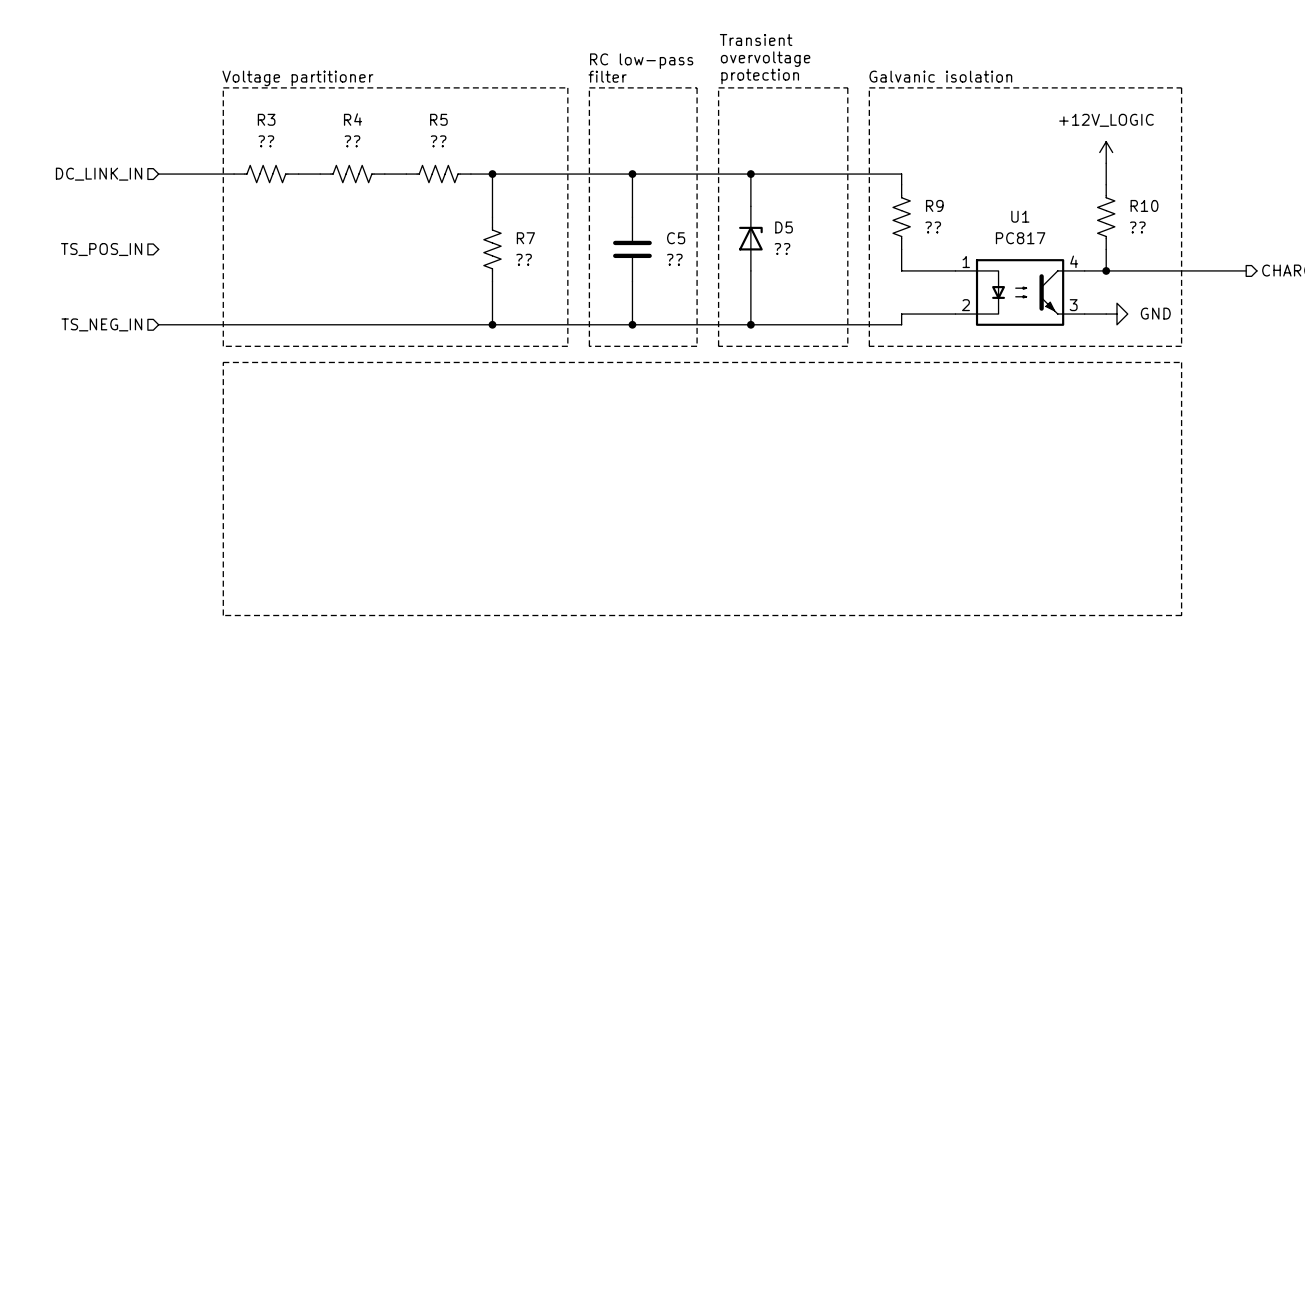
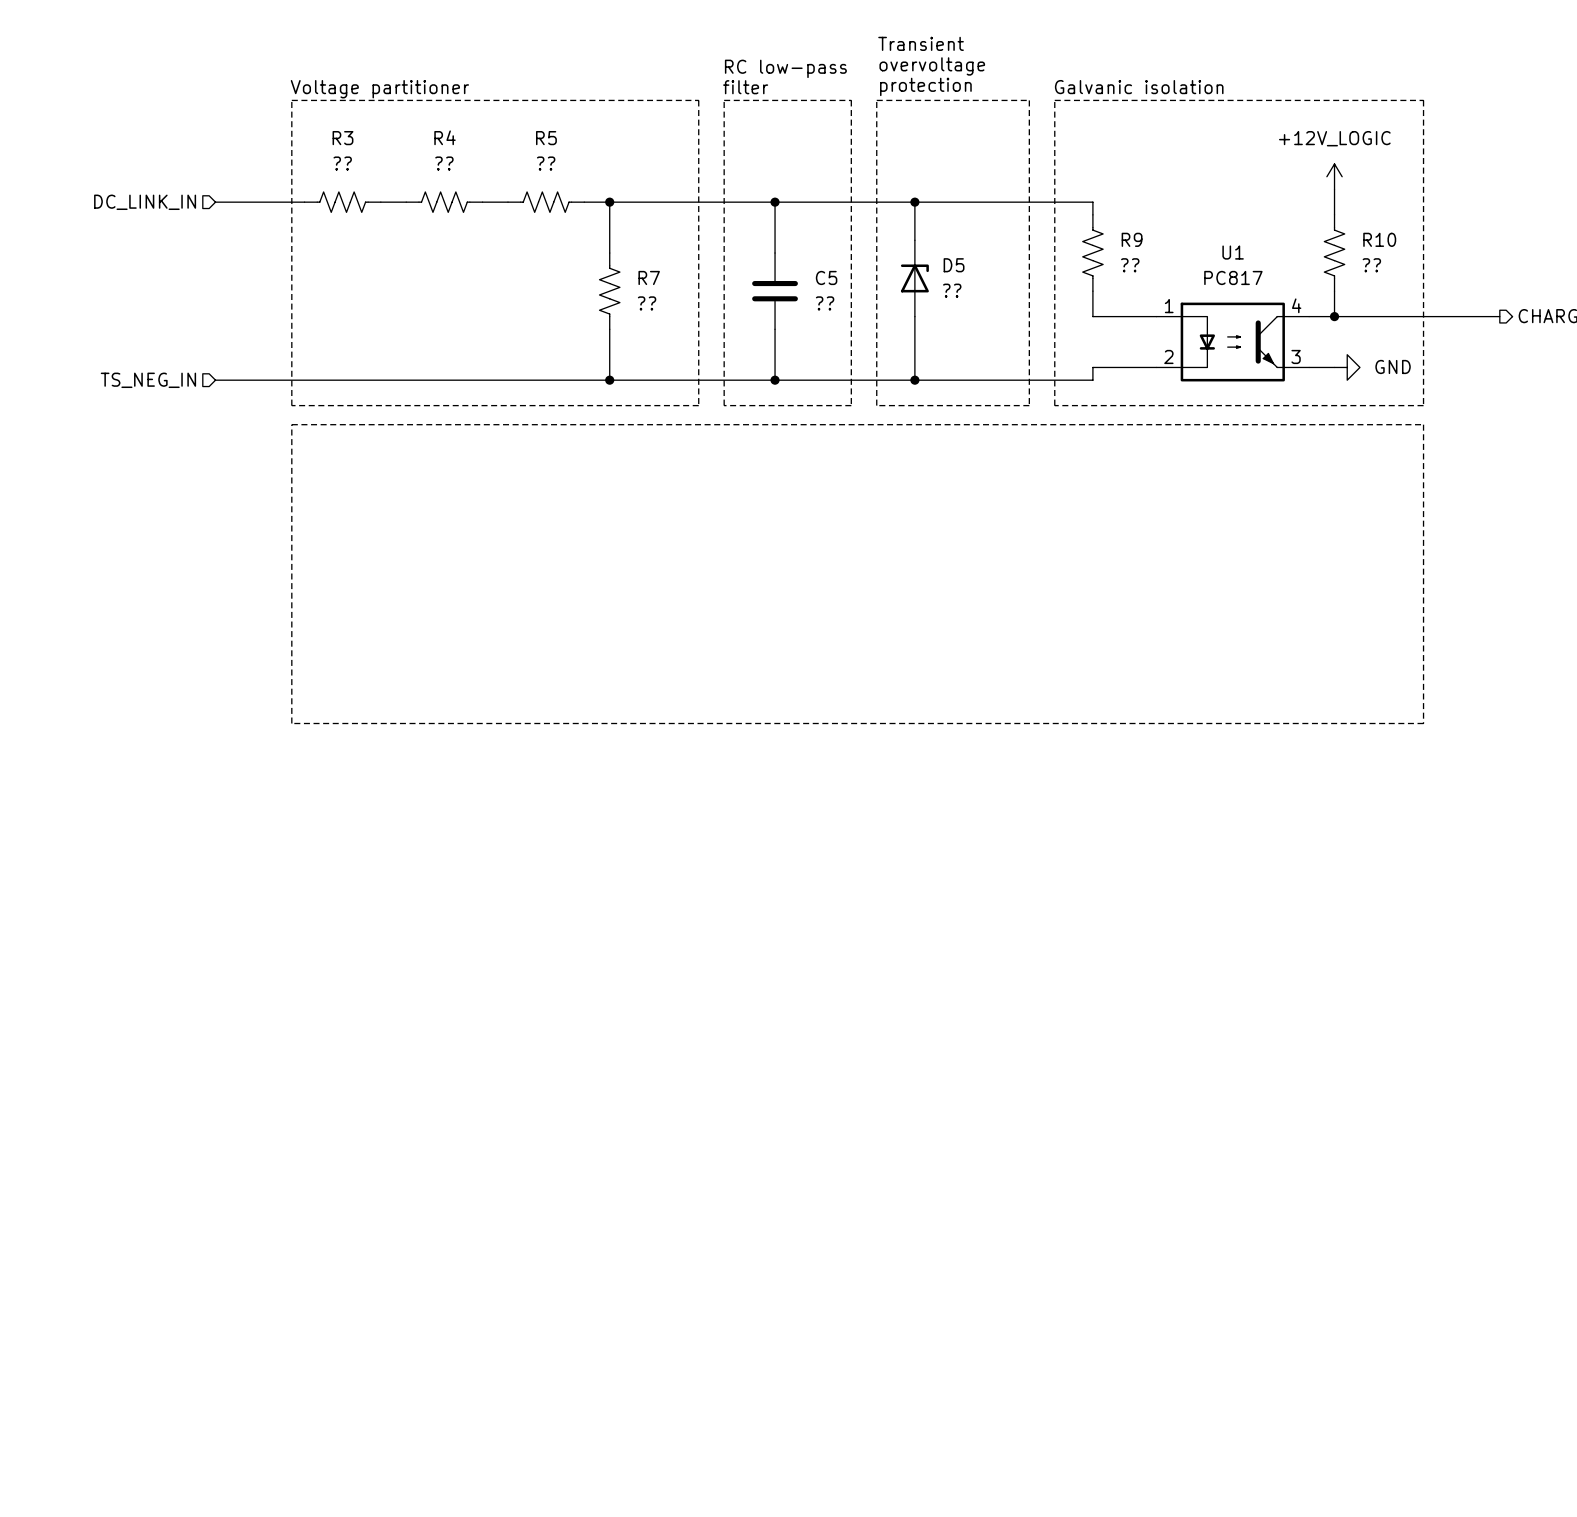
hierarchical label: TS_POS_IN (101, 249) -> none

